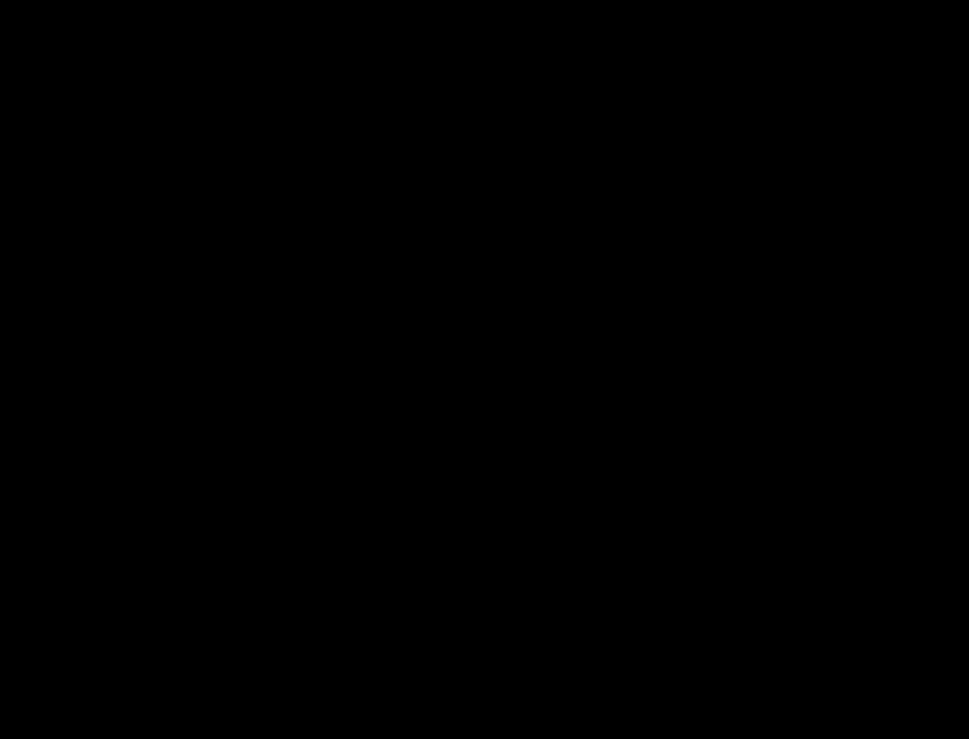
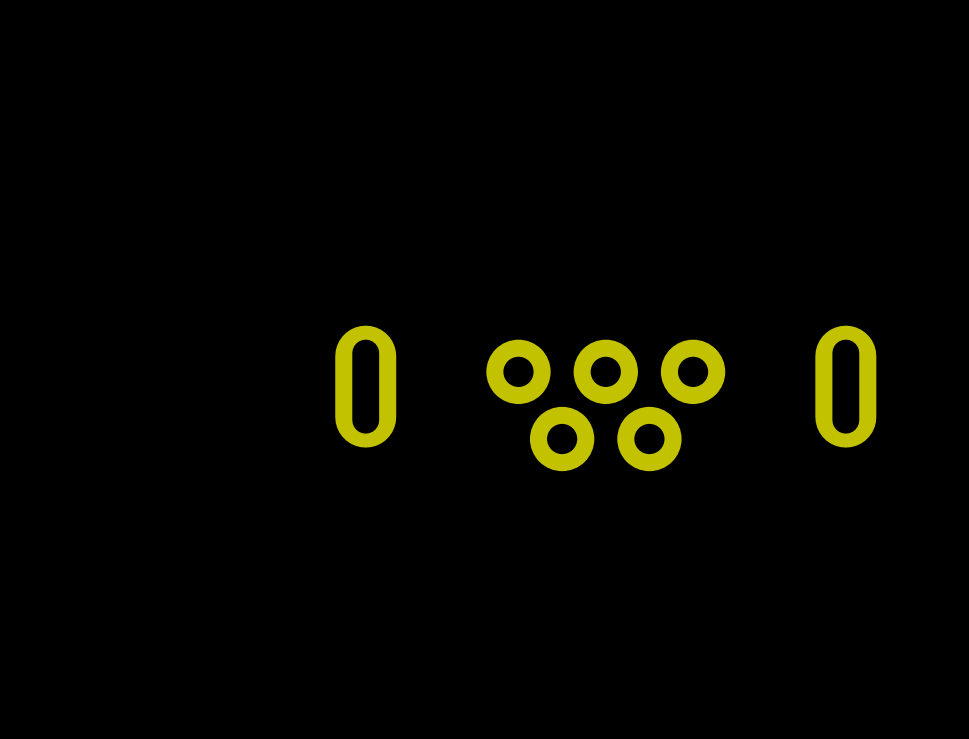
part: none -> (605, 398)

